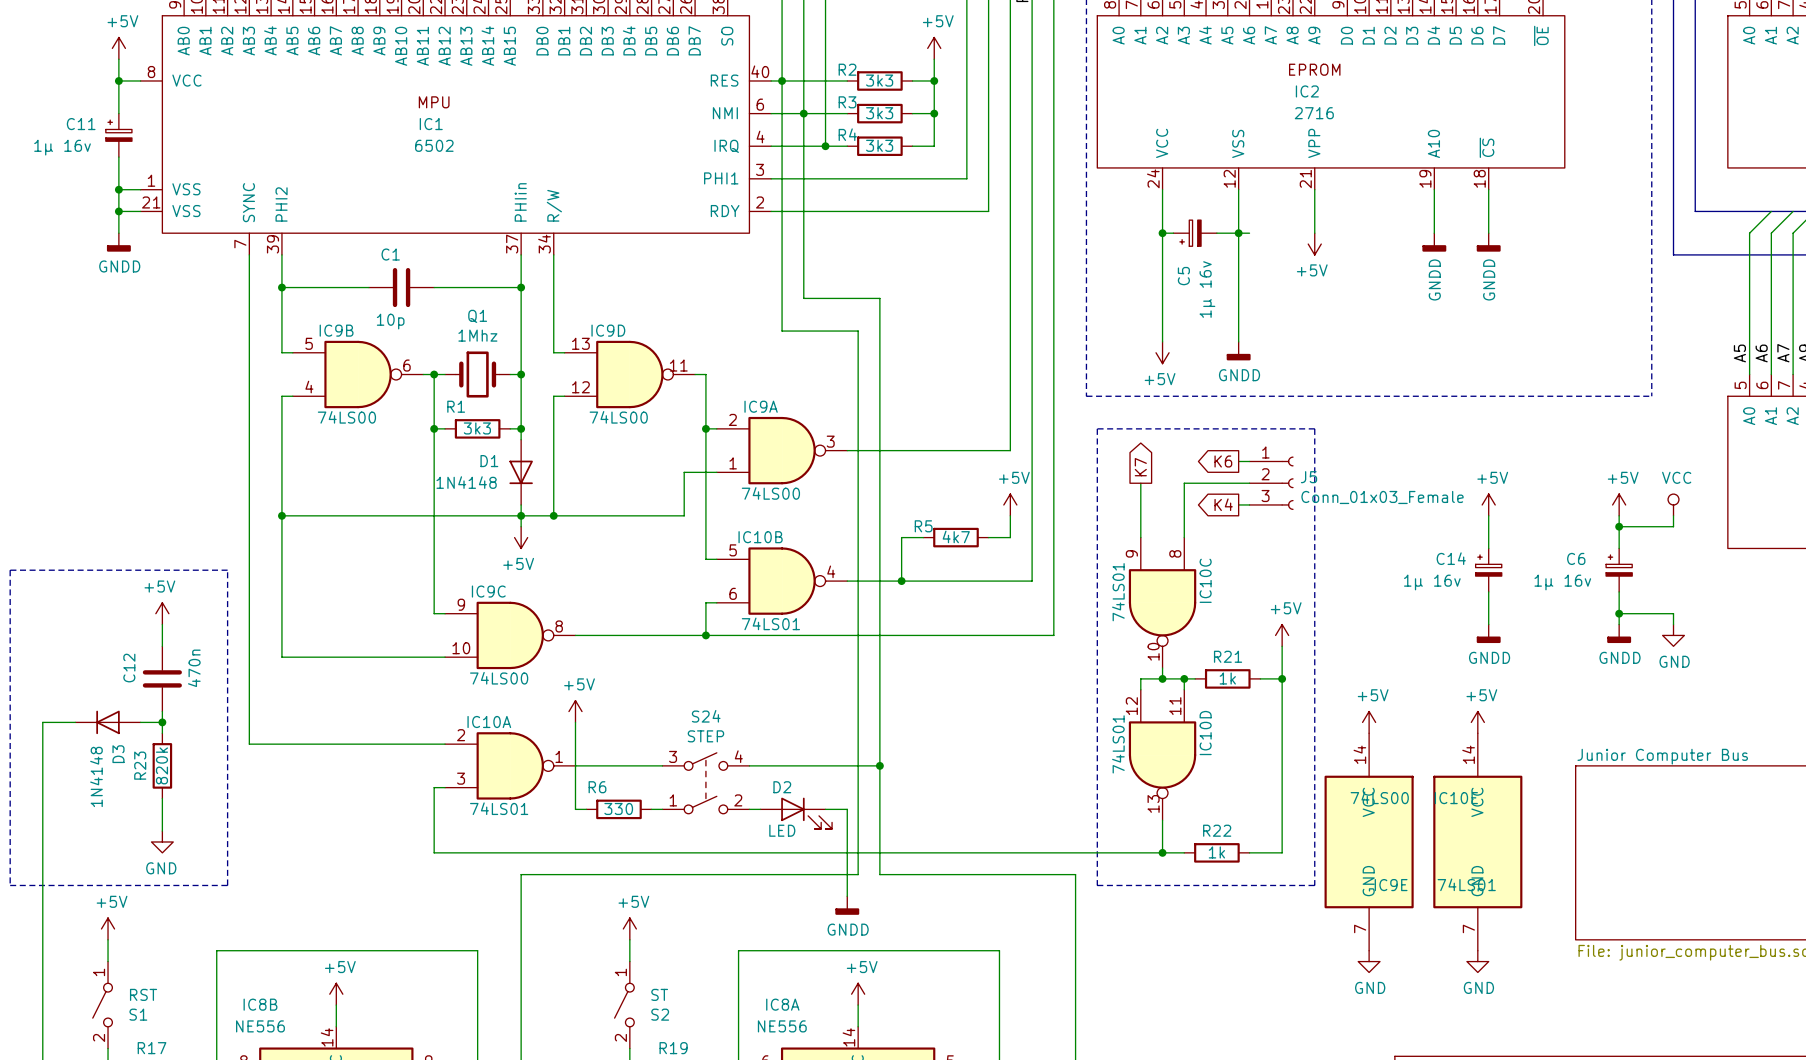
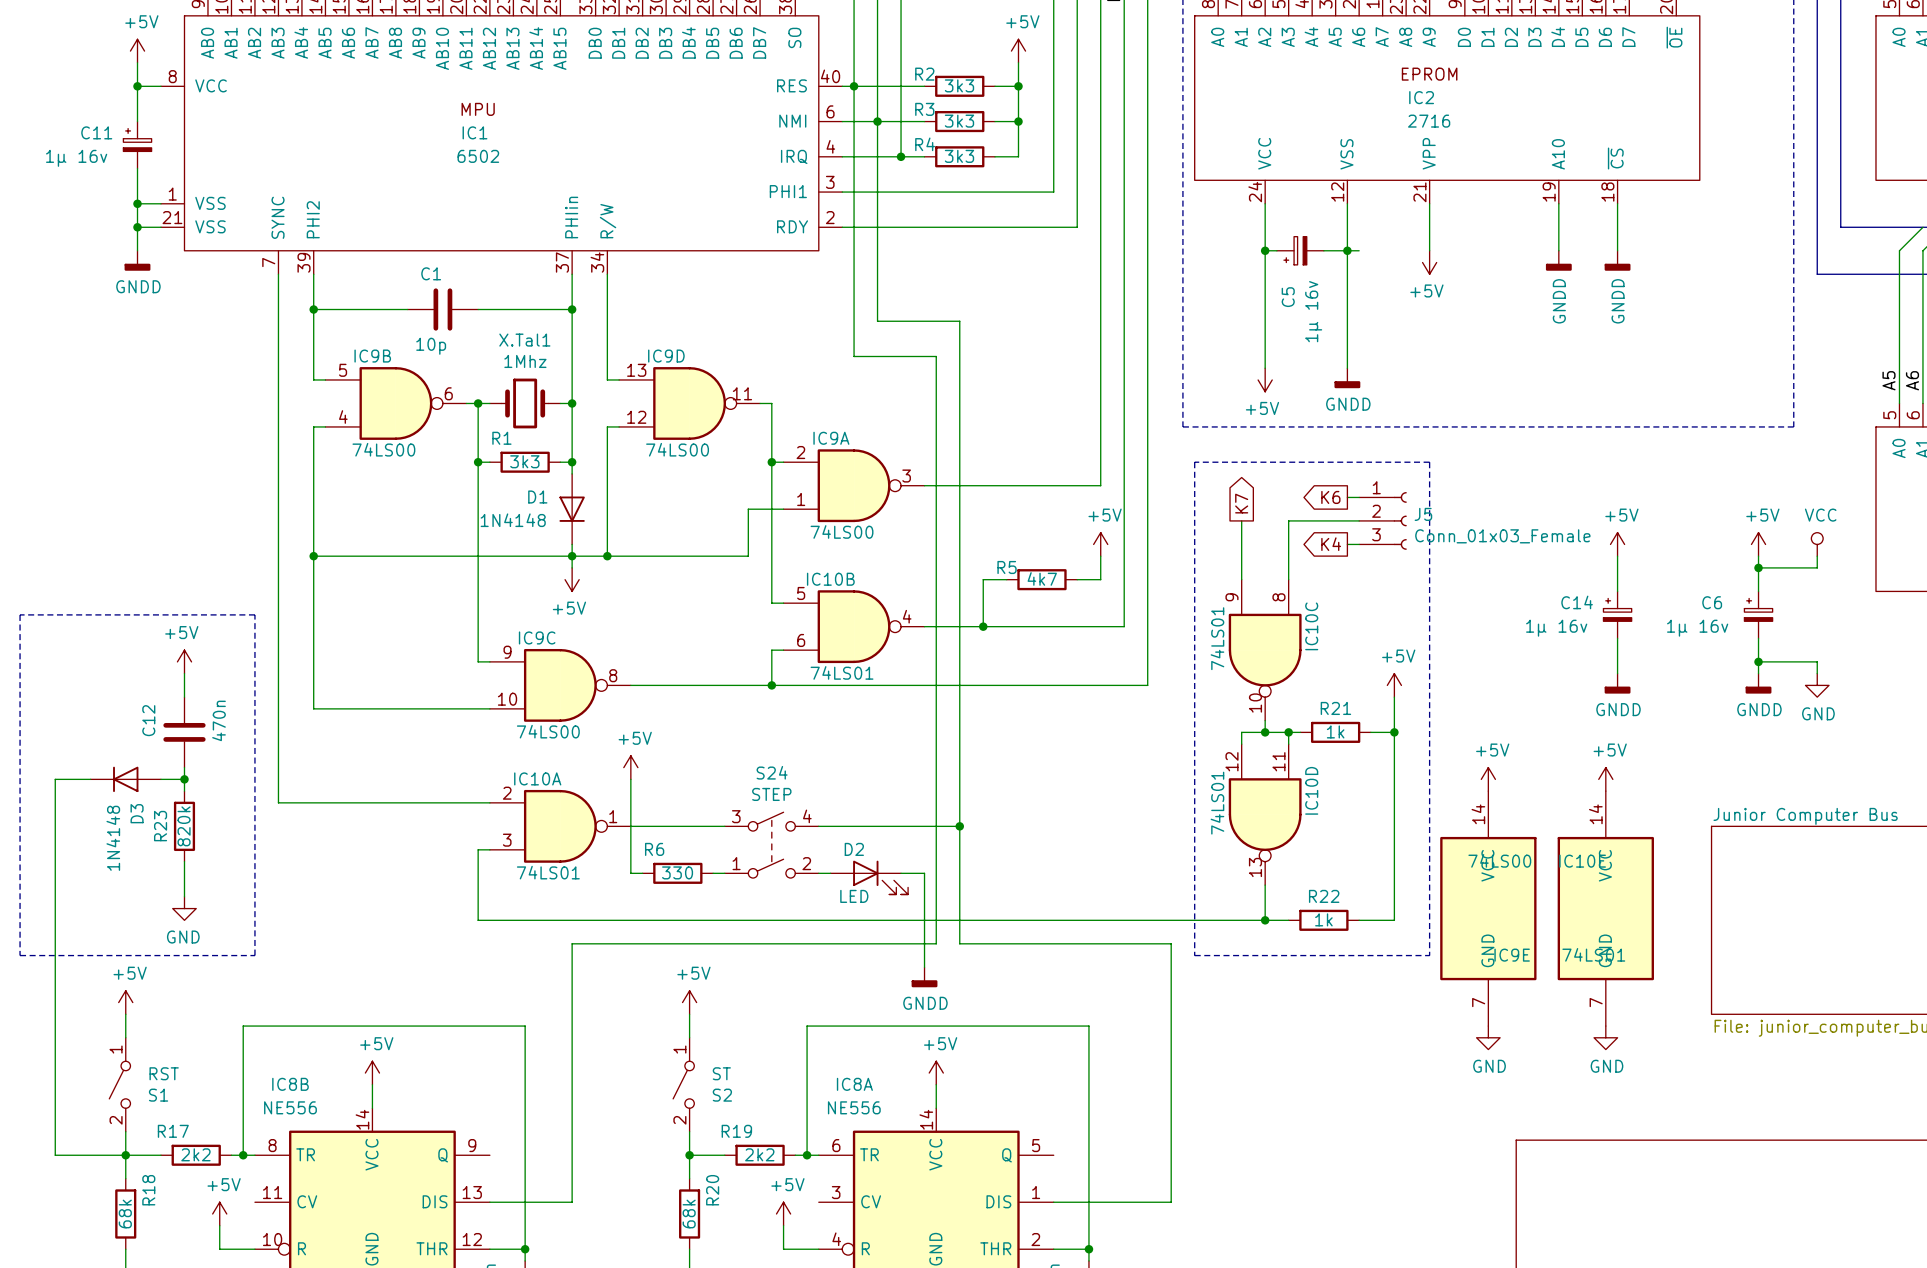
Q1 name: Q1 (477, 316) -> X.Tal1 (524, 340)

